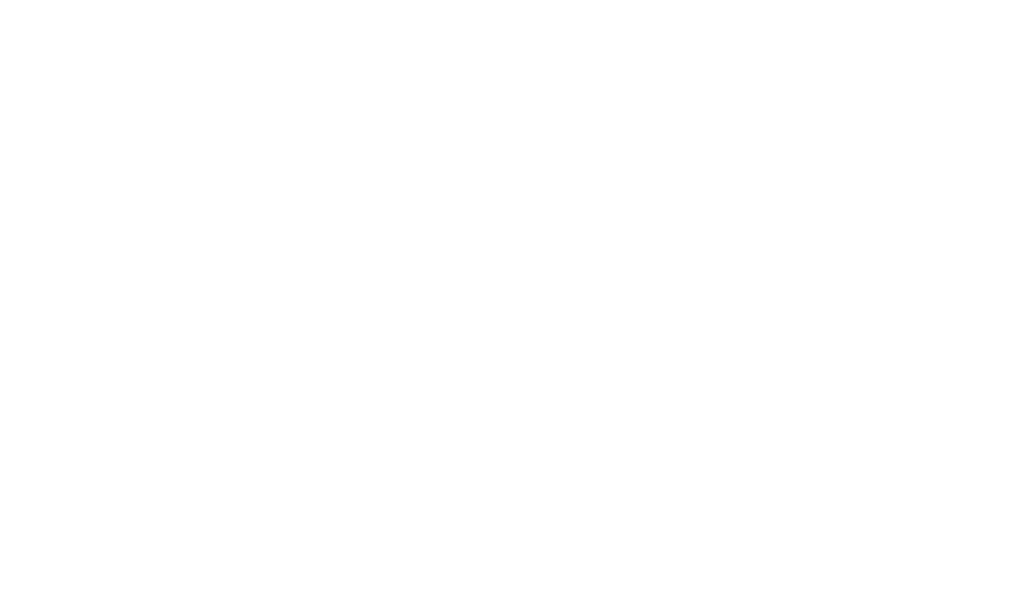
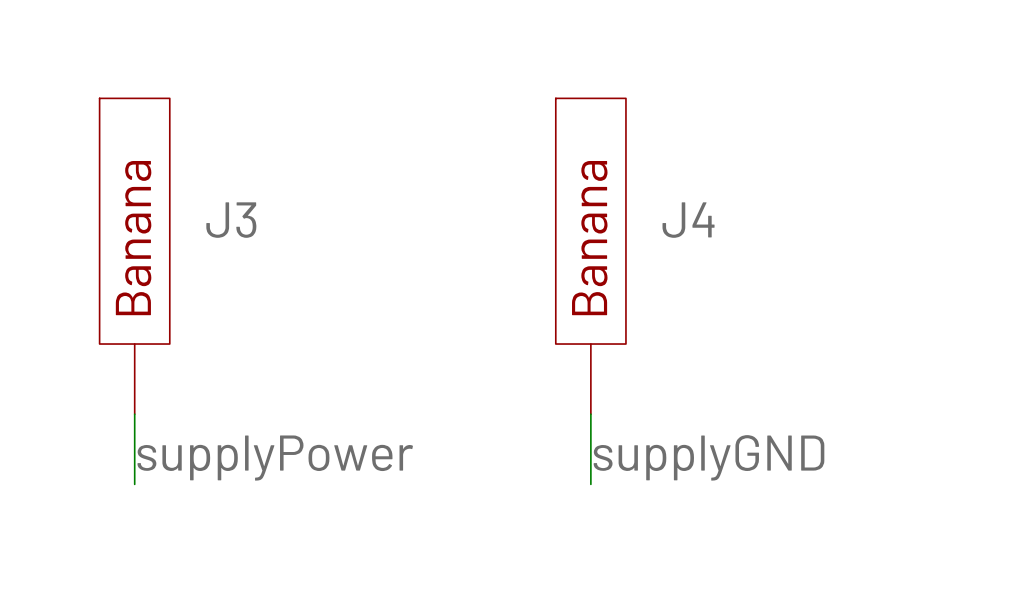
J3: none -> (134, 256)
J4: none -> (590, 256)
wire: none -> (134, 414) (134, 484)
wire: none -> (590, 414) (590, 484)
label: none -> supplyPower (275, 458)
label: none -> supplyGND (709, 457)

